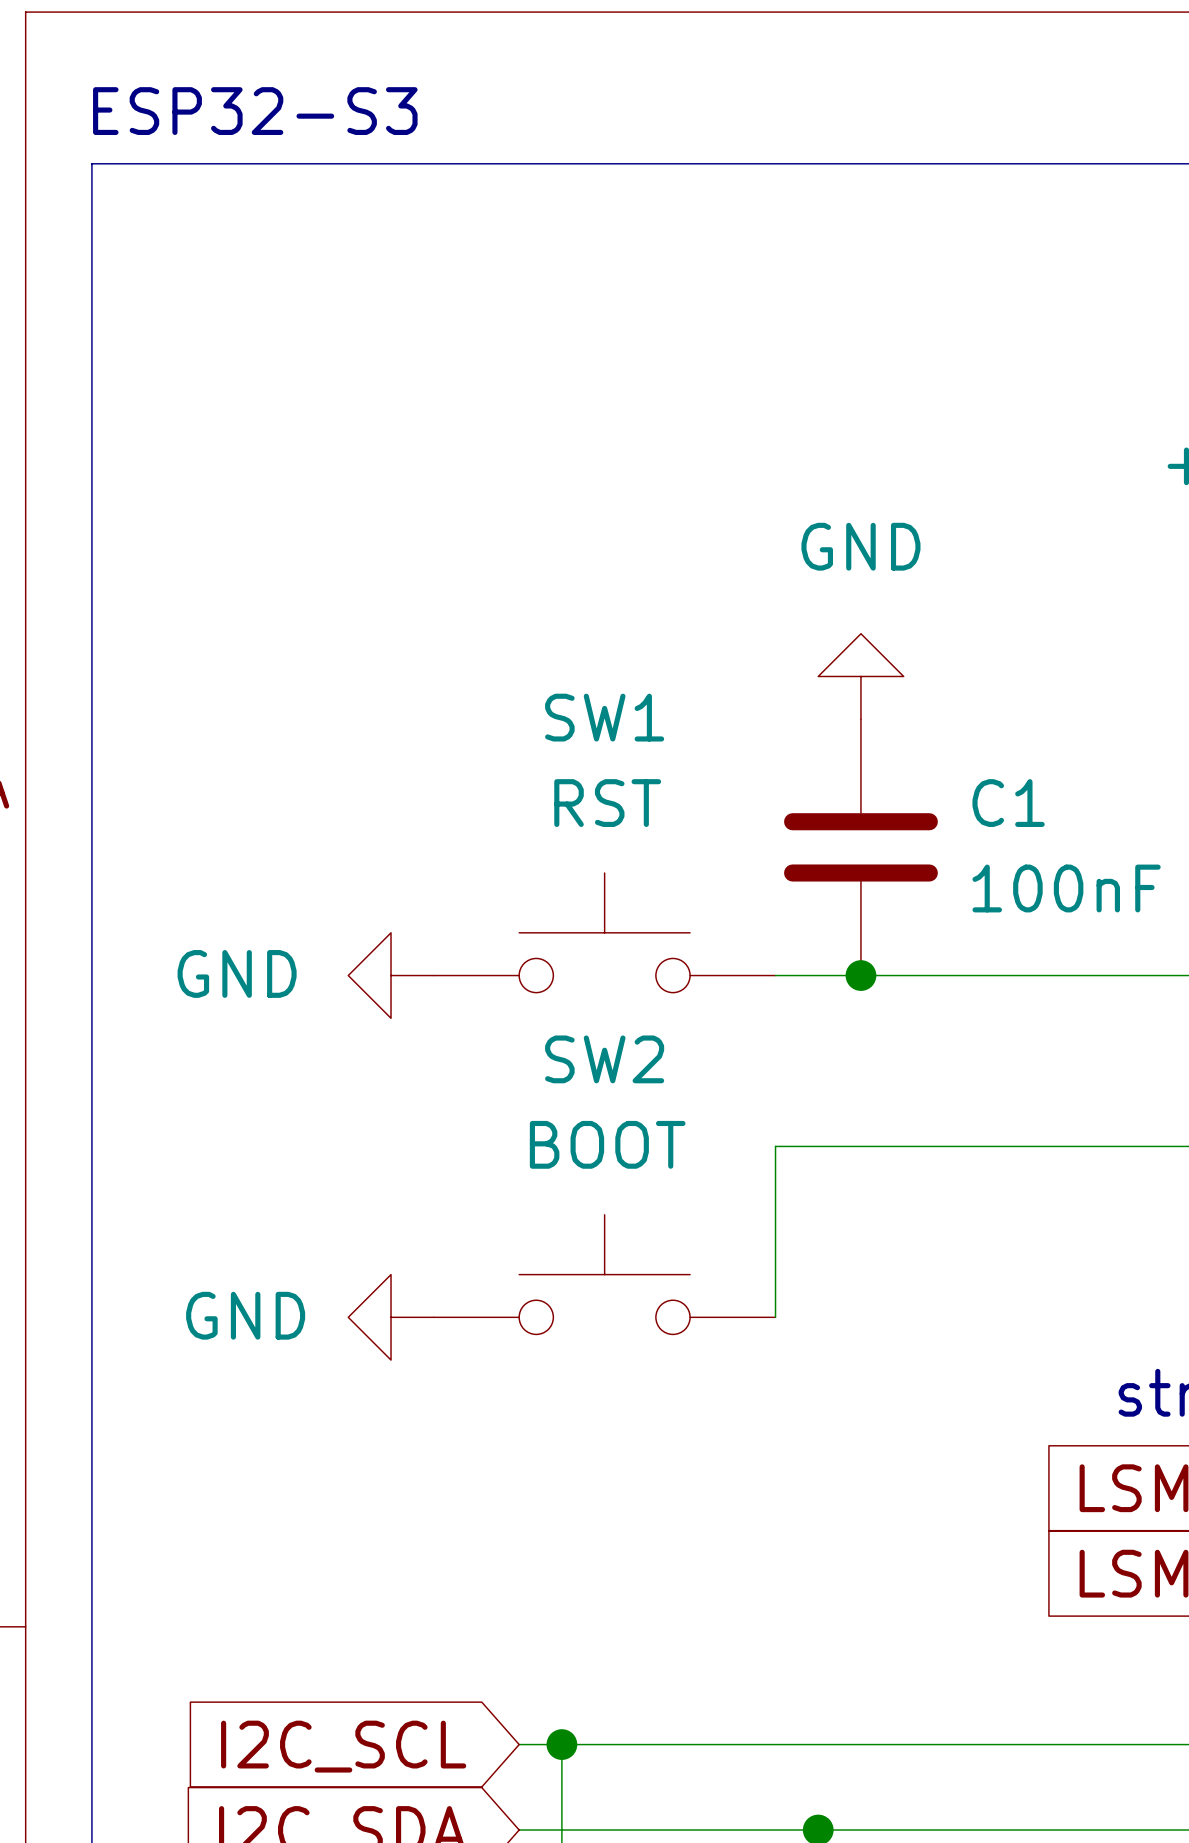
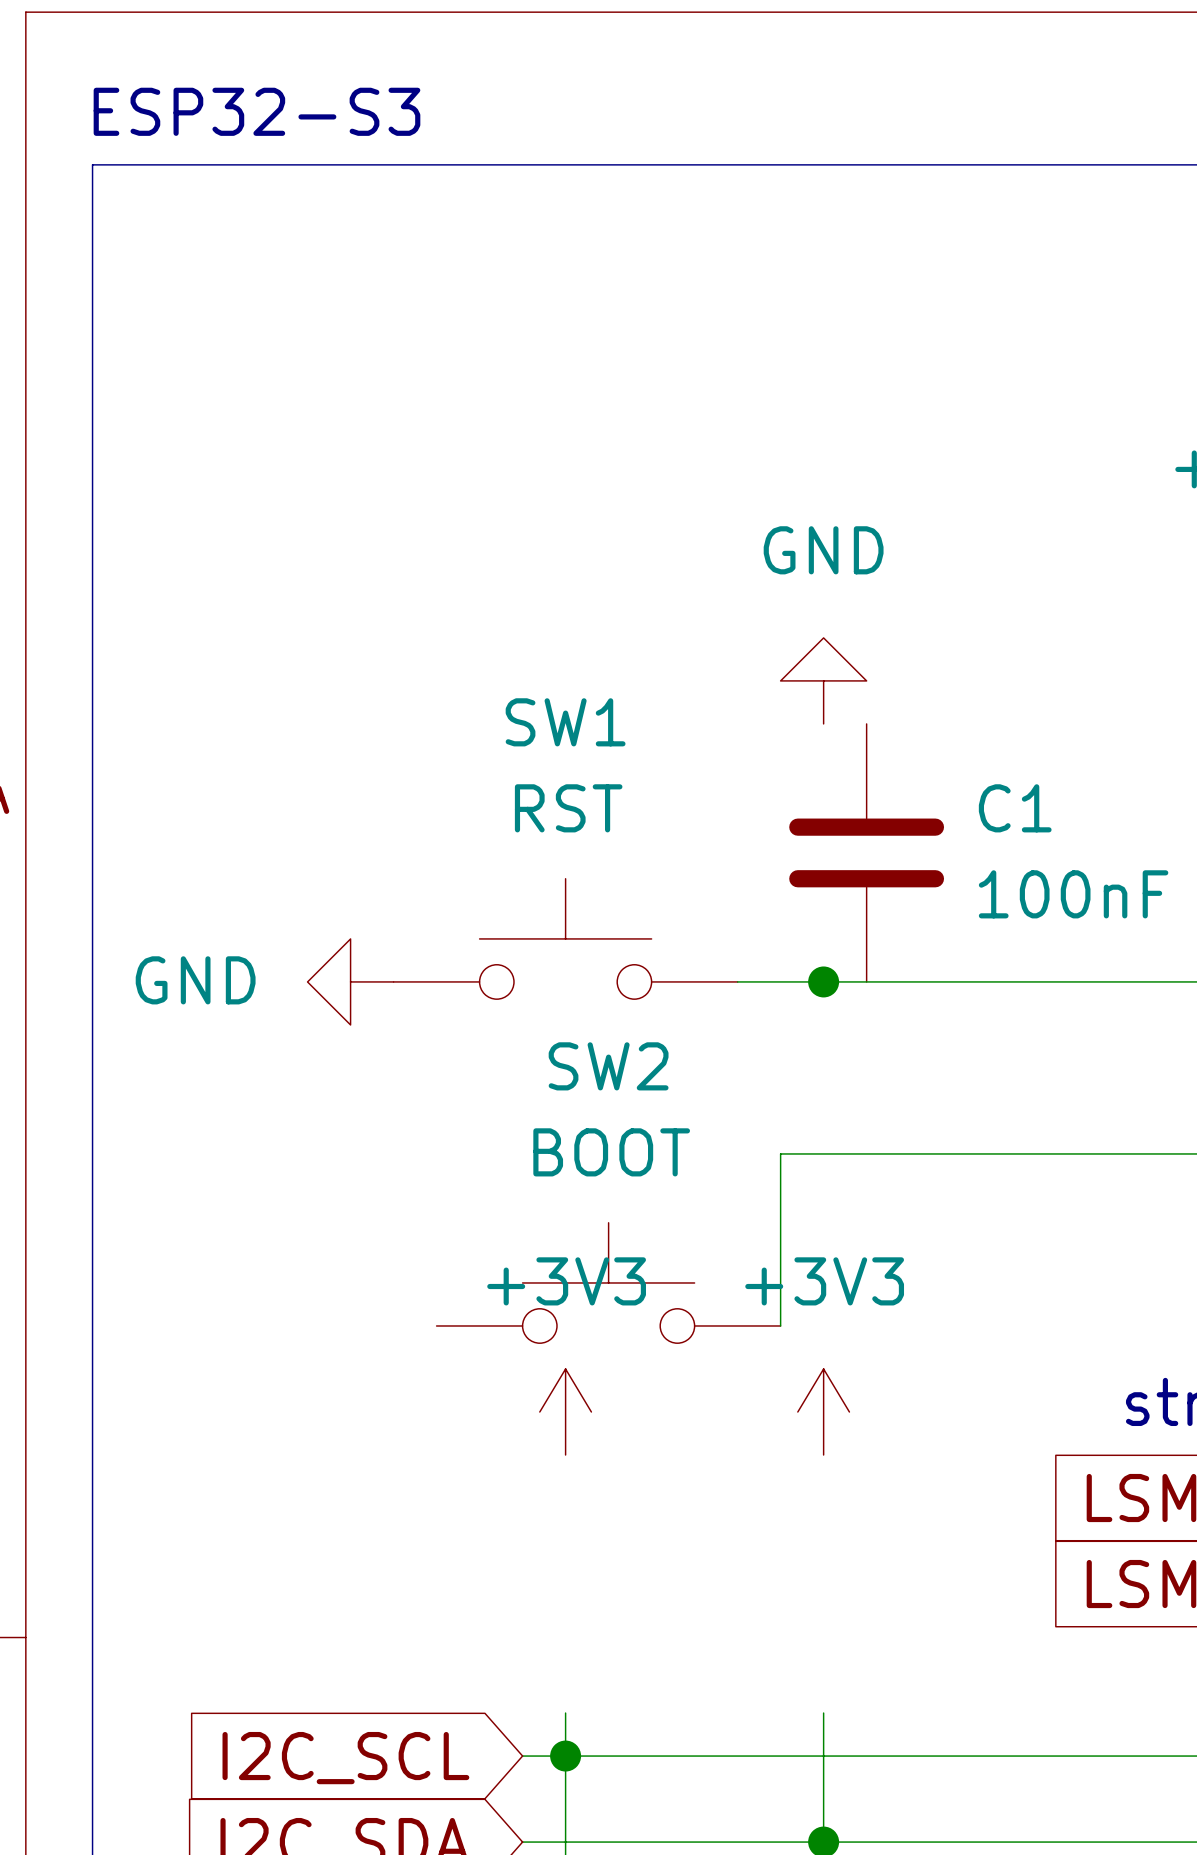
power symbol position: GND (860, 676) -> GND (823, 680)
SW1 position: (604, 932) -> (565, 938)
power symbol position: GND (391, 975) -> GND (350, 981)
junction position: (860, 975) -> (823, 981)
power symbol: GND (391, 1317) -> none
power symbol: none -> +3V3 (565, 1412)
power symbol: none -> +3V3 (823, 1412)
wire: none -> (565, 1713) (565, 1756)
wire: none -> (823, 1713) (823, 1842)

